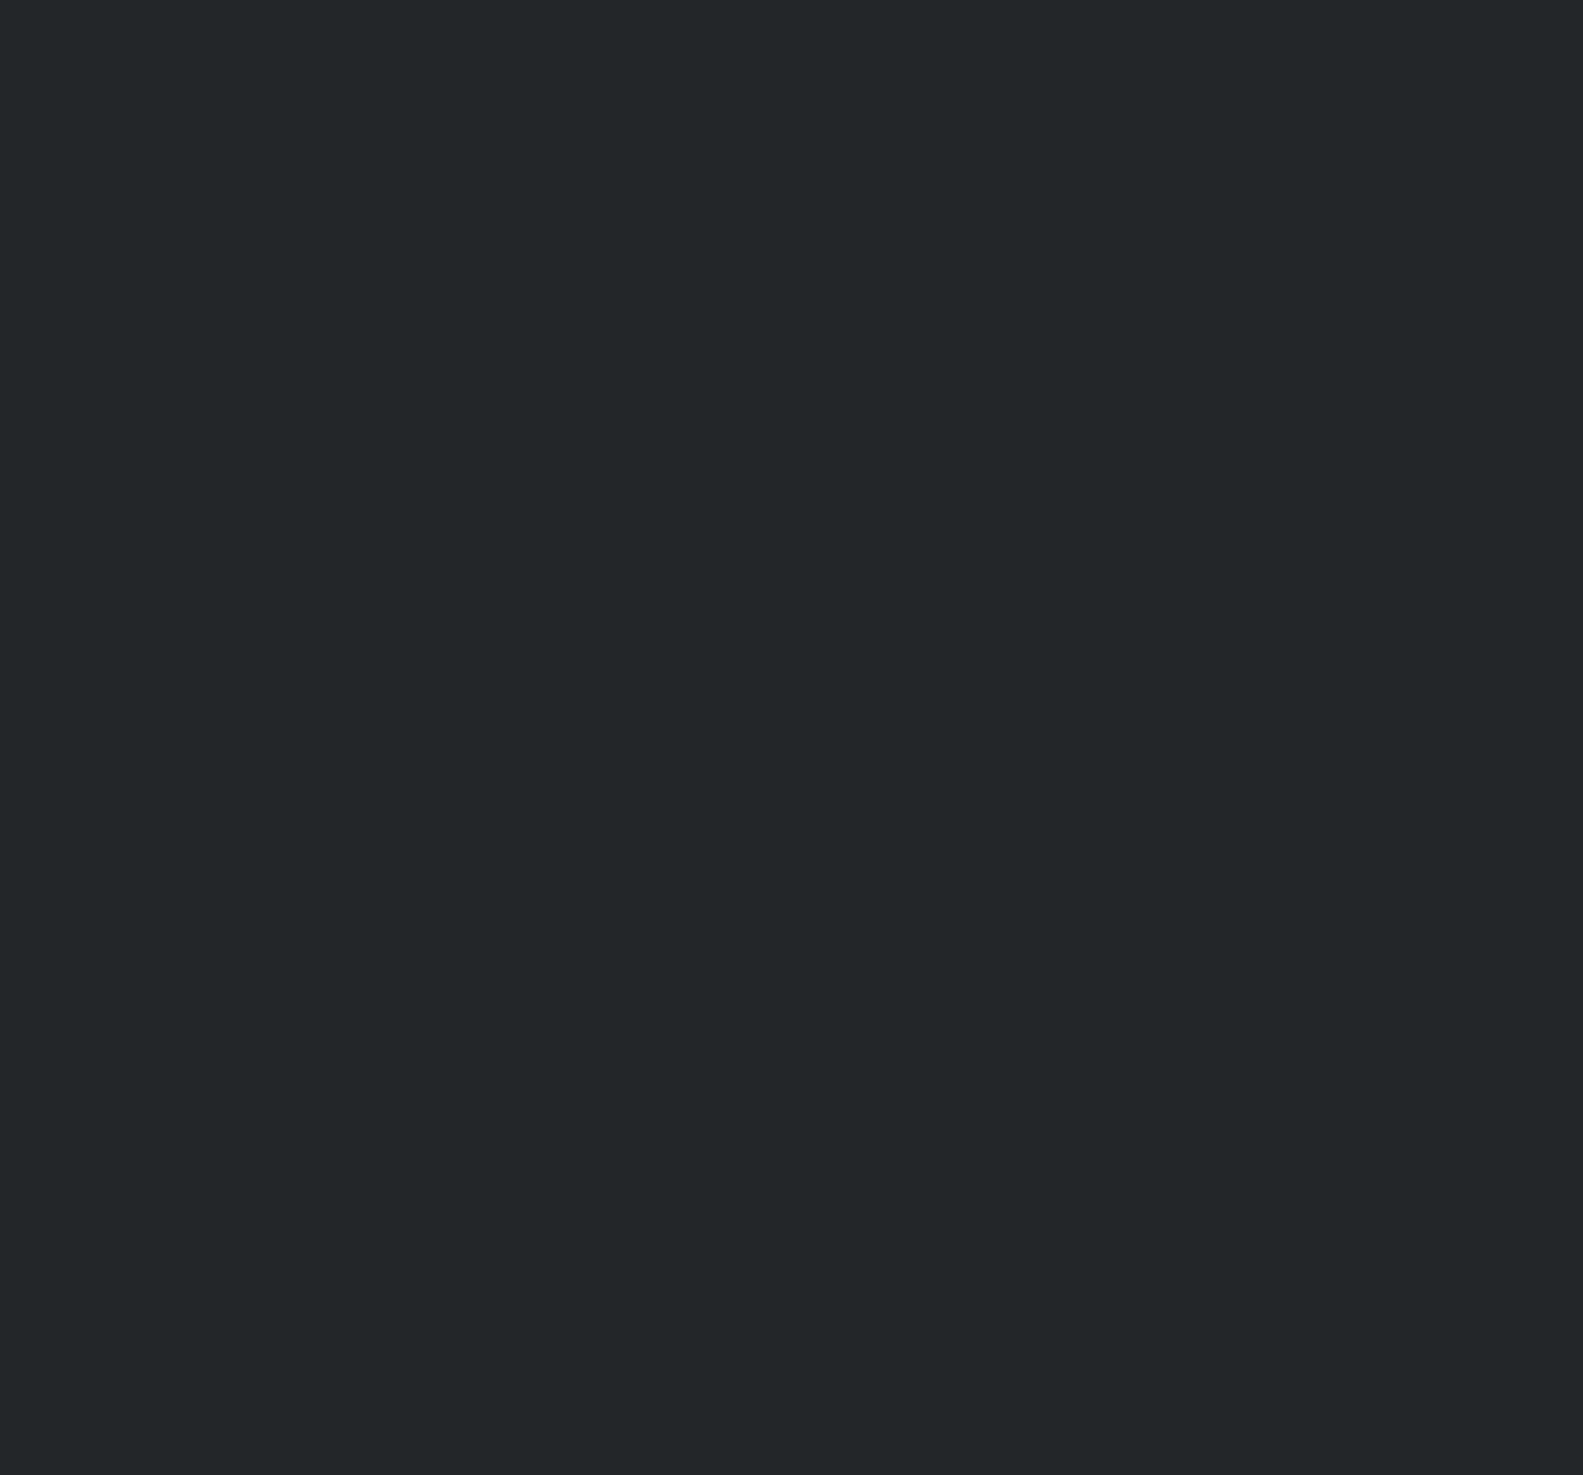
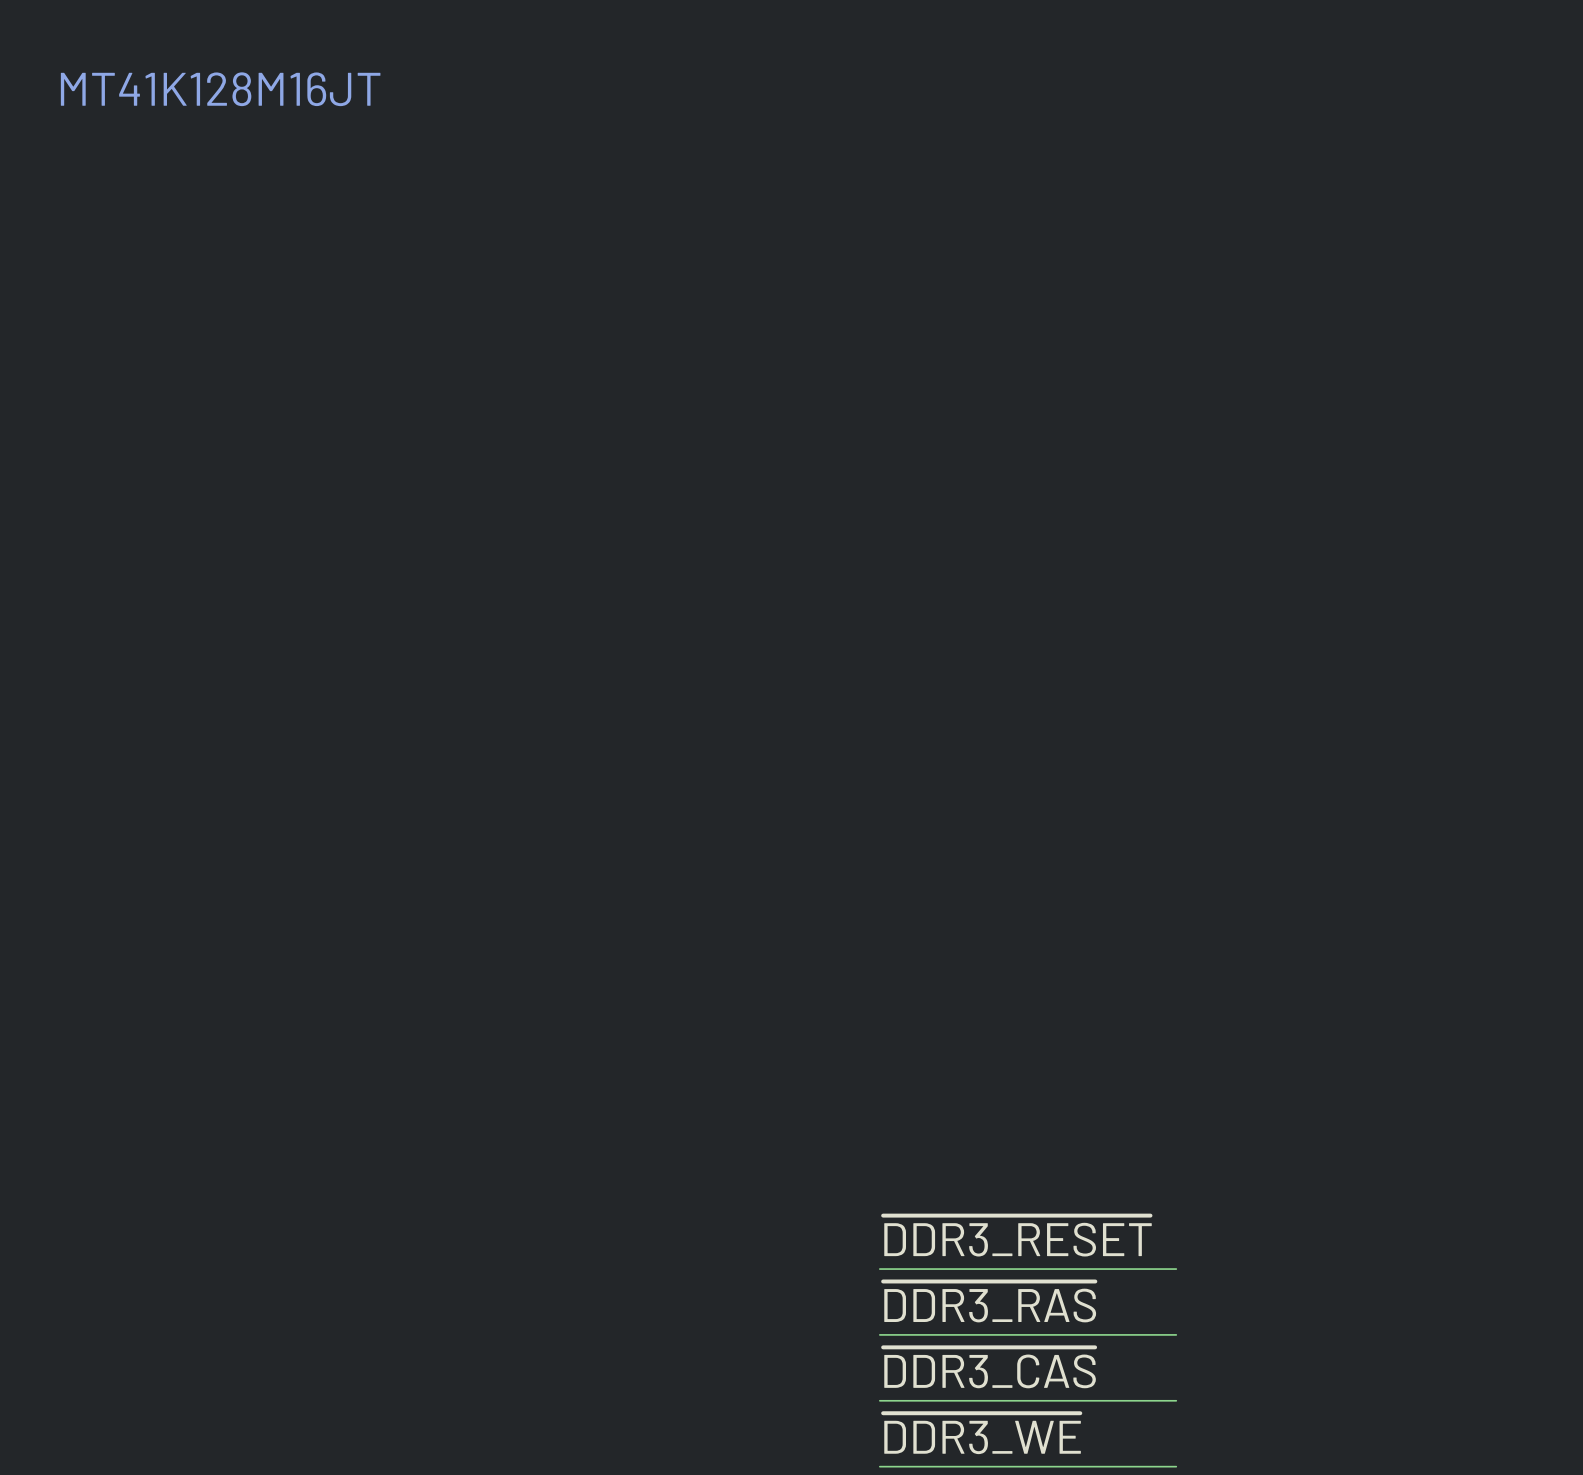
text: none -> MT41K128M16JT (220, 89)
label: none -> ~{DDR3_RESET} (1017, 1236)
wire: none -> (879, 1269) (1176, 1269)
label: none -> ~{DDR3_RAS} (989, 1301)
wire: none -> (879, 1334) (1176, 1334)
label: none -> ~{DDR3_CAS} (989, 1367)
wire: none -> (879, 1400) (1176, 1400)
label: none -> ~{DDR3_WE} (981, 1433)
wire: none -> (879, 1466) (1176, 1466)

